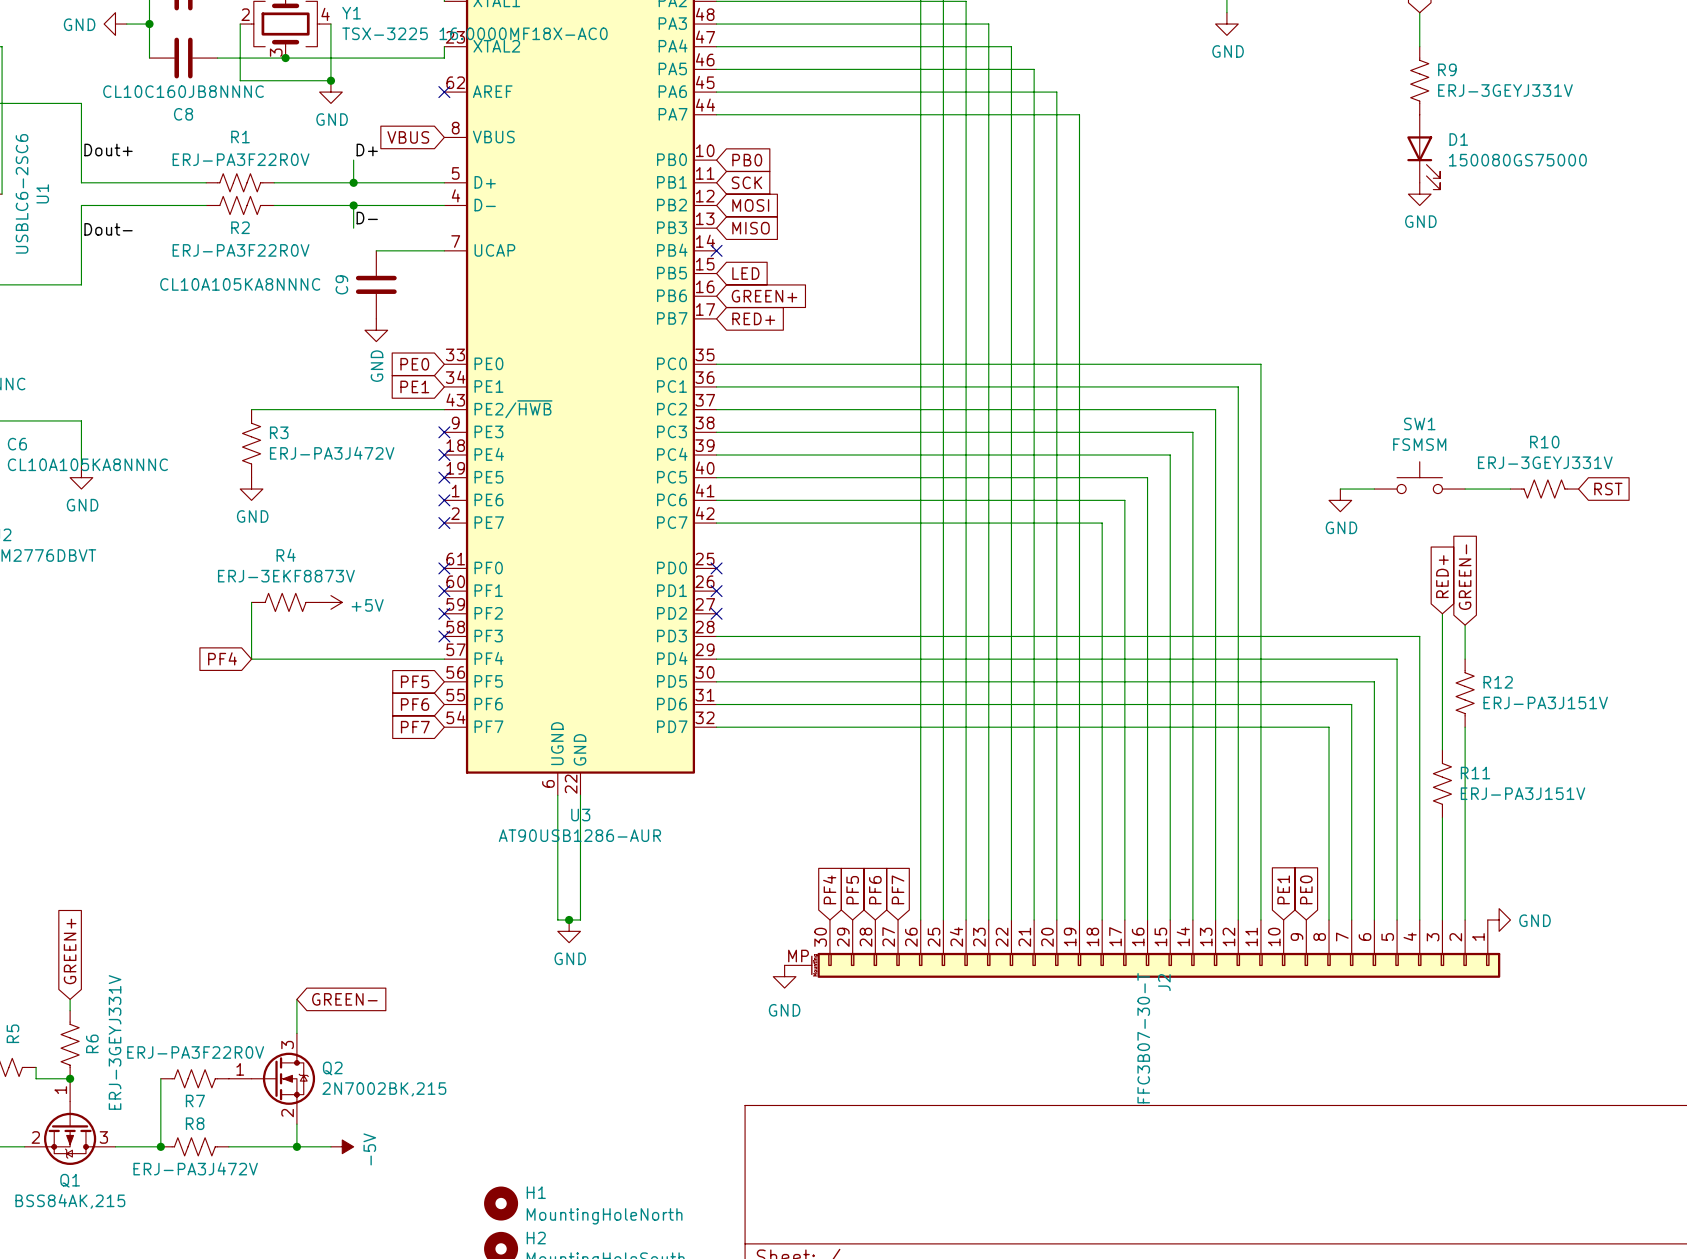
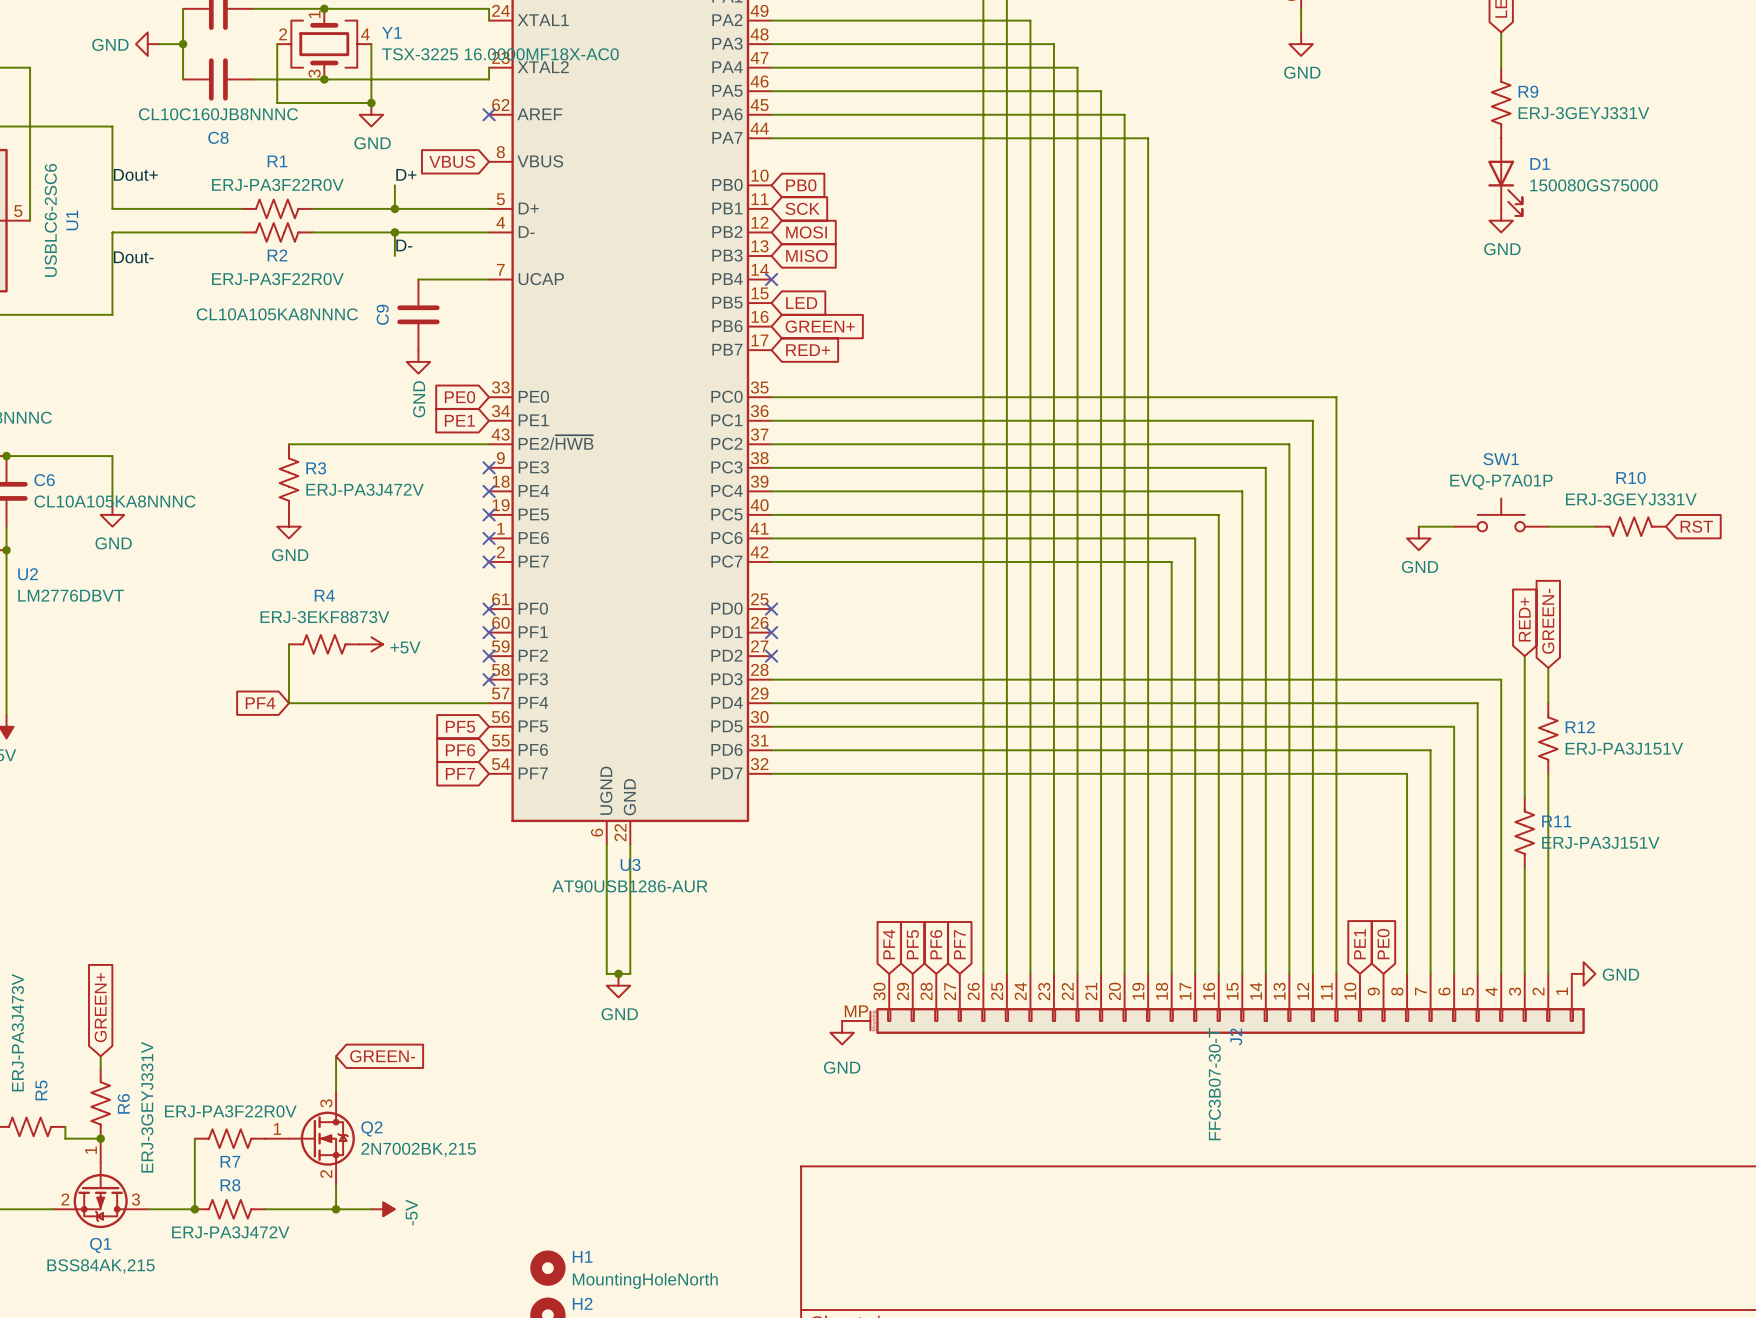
SW1 value: FSMSM (1419, 444) -> EVQ-P7A01P (1501, 482)

